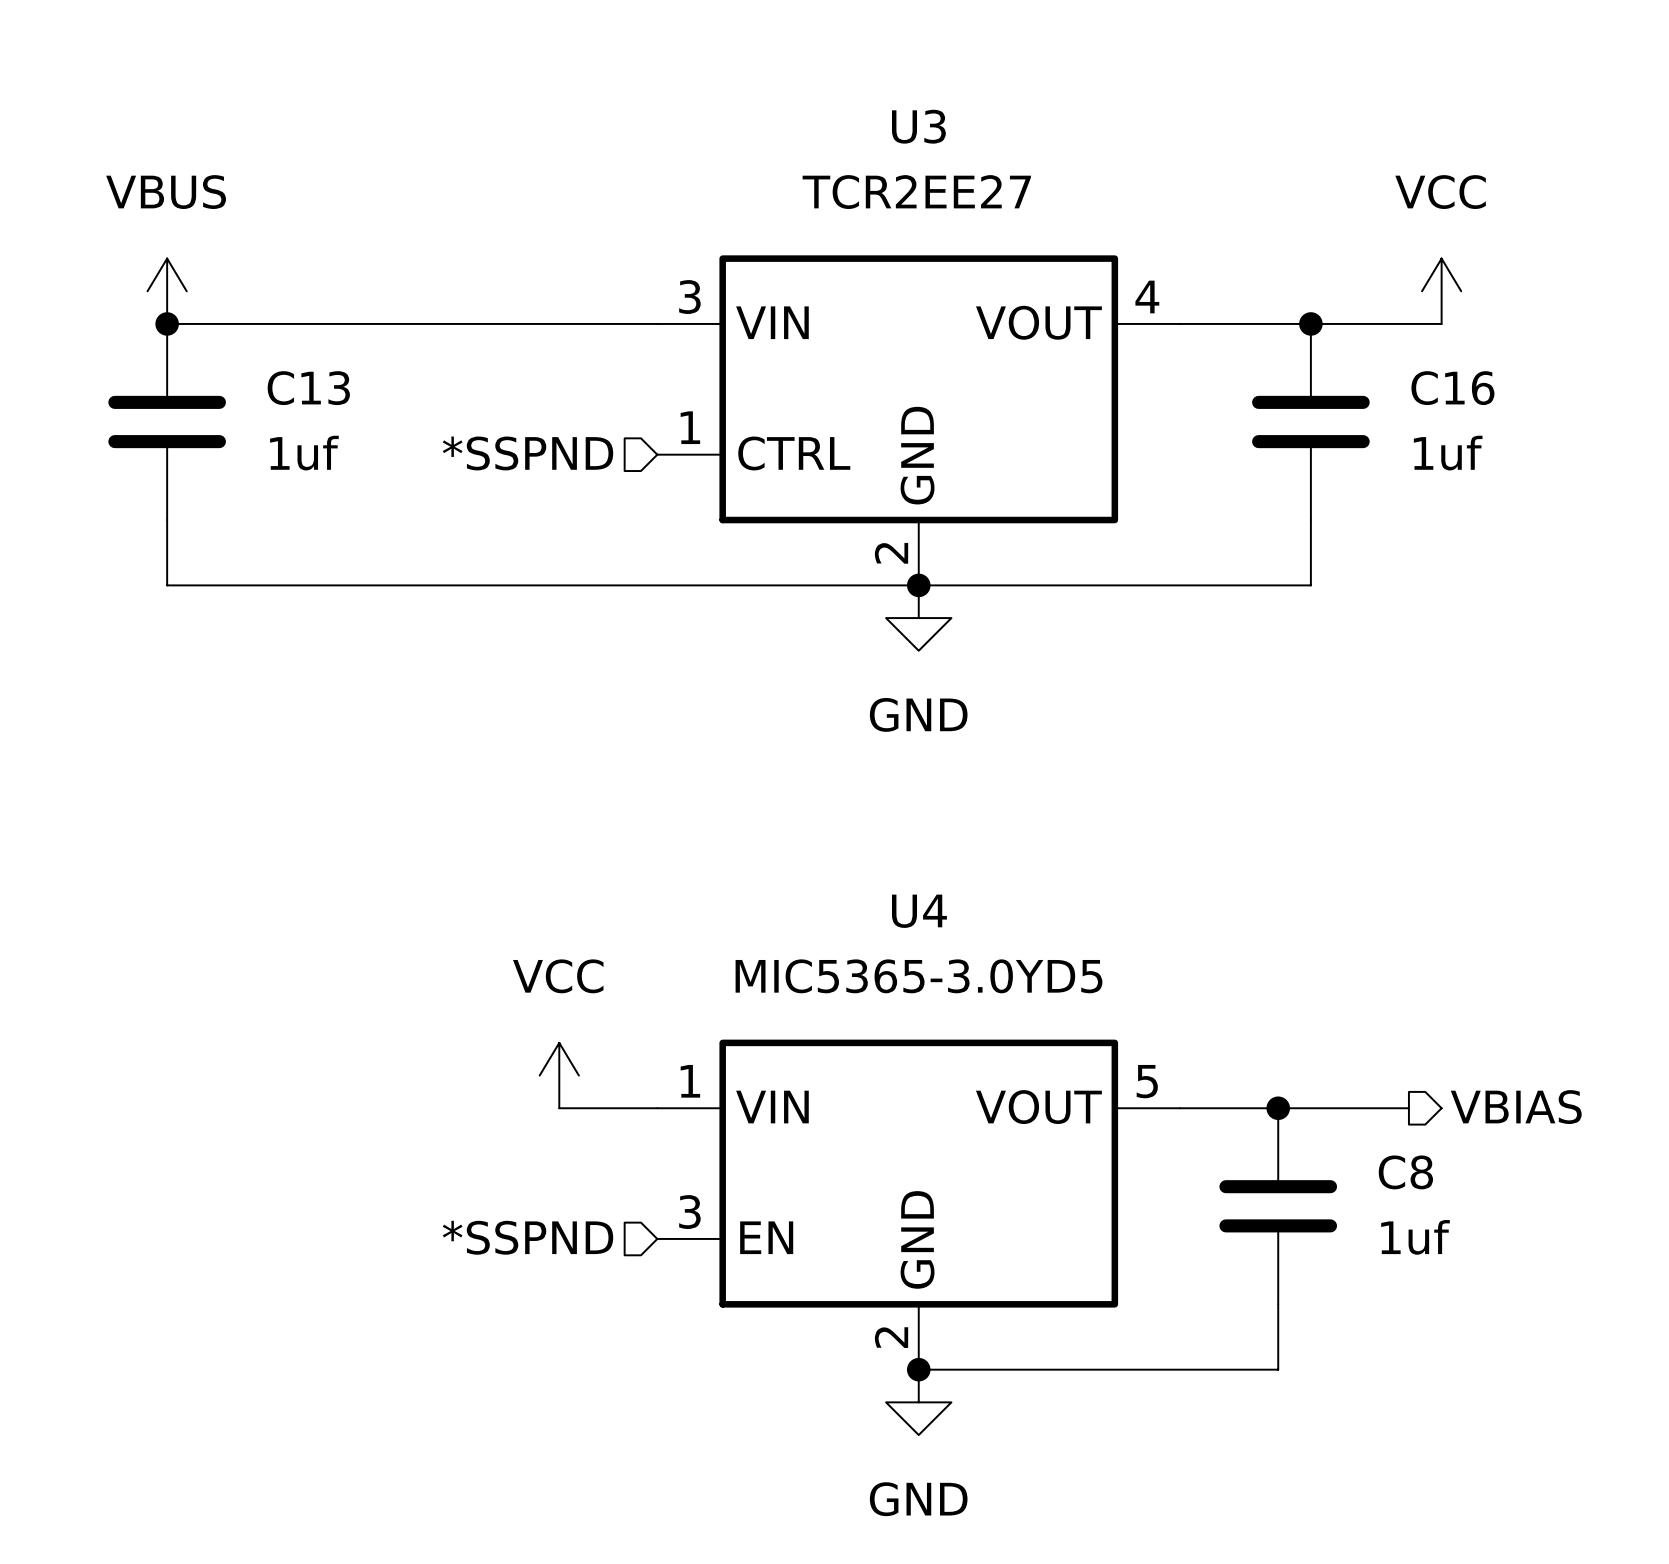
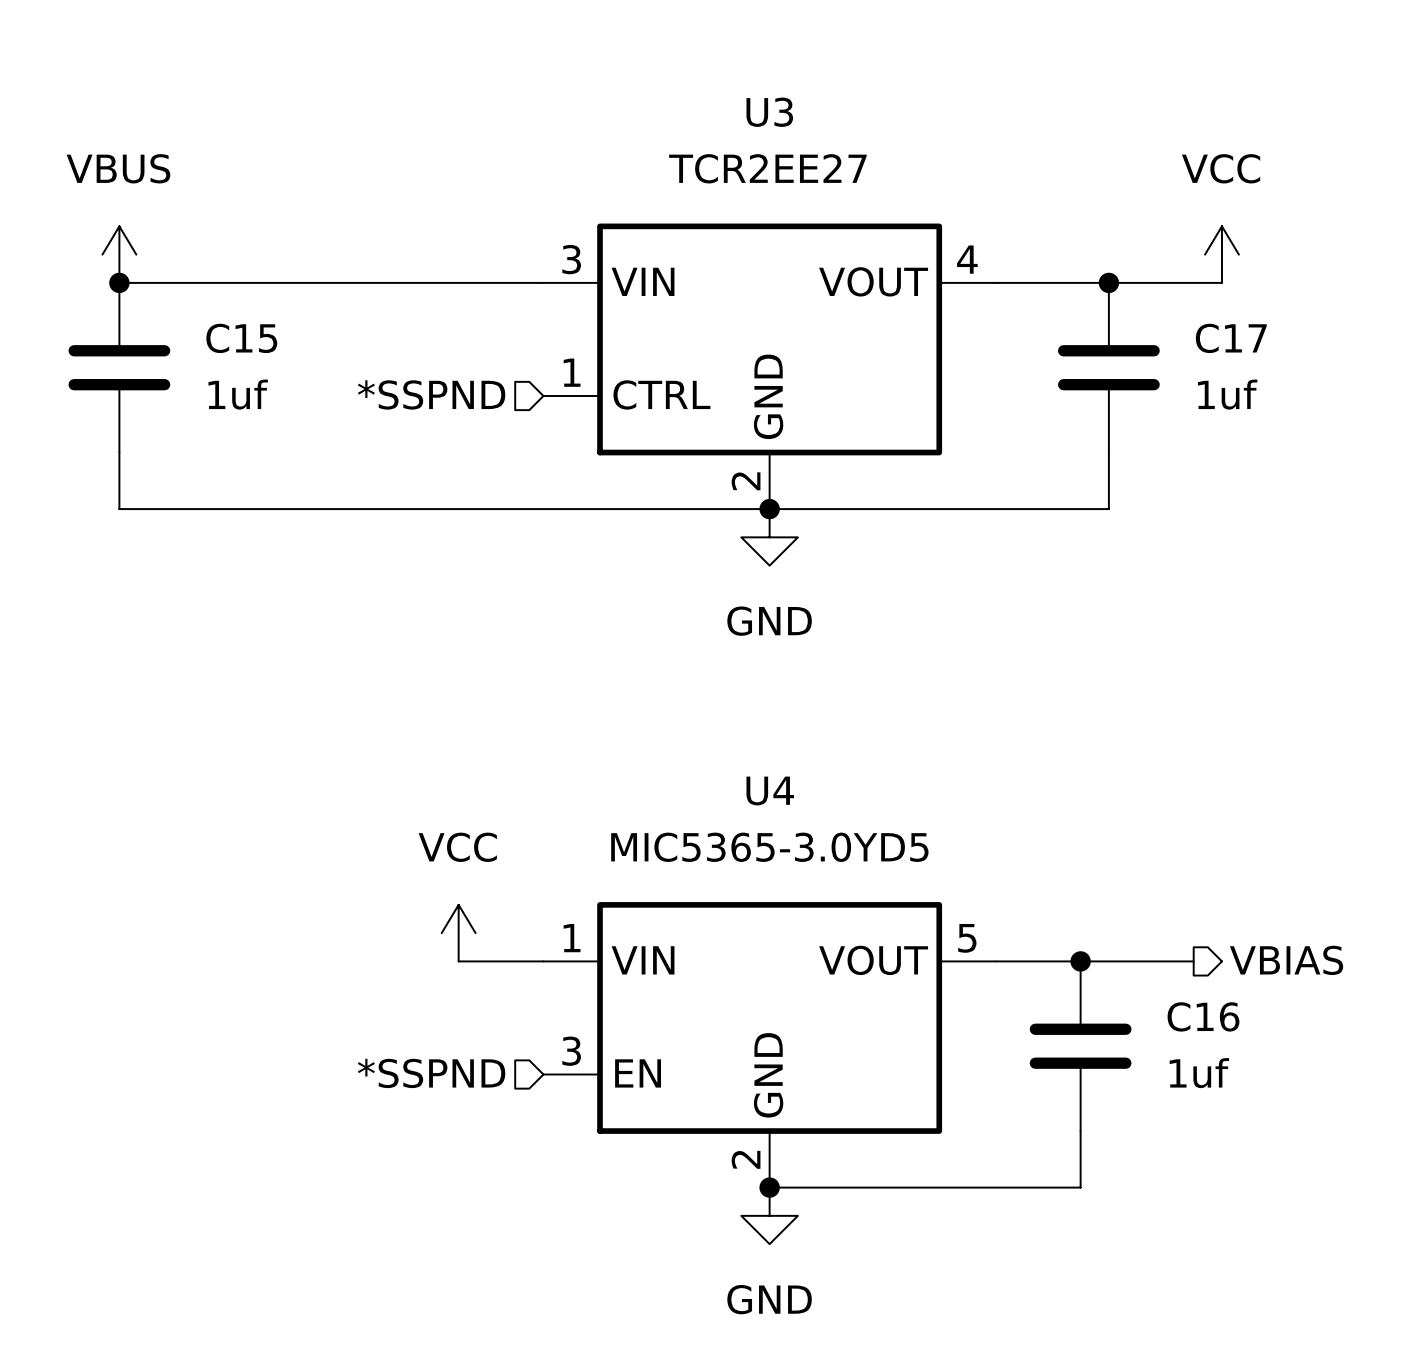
C13 name: C13 (308, 388) -> C15 (241, 338)
C16 name: C16 (1452, 388) -> C17 (1231, 338)
C8 name: C8 (1405, 1172) -> C16 (1203, 1016)

